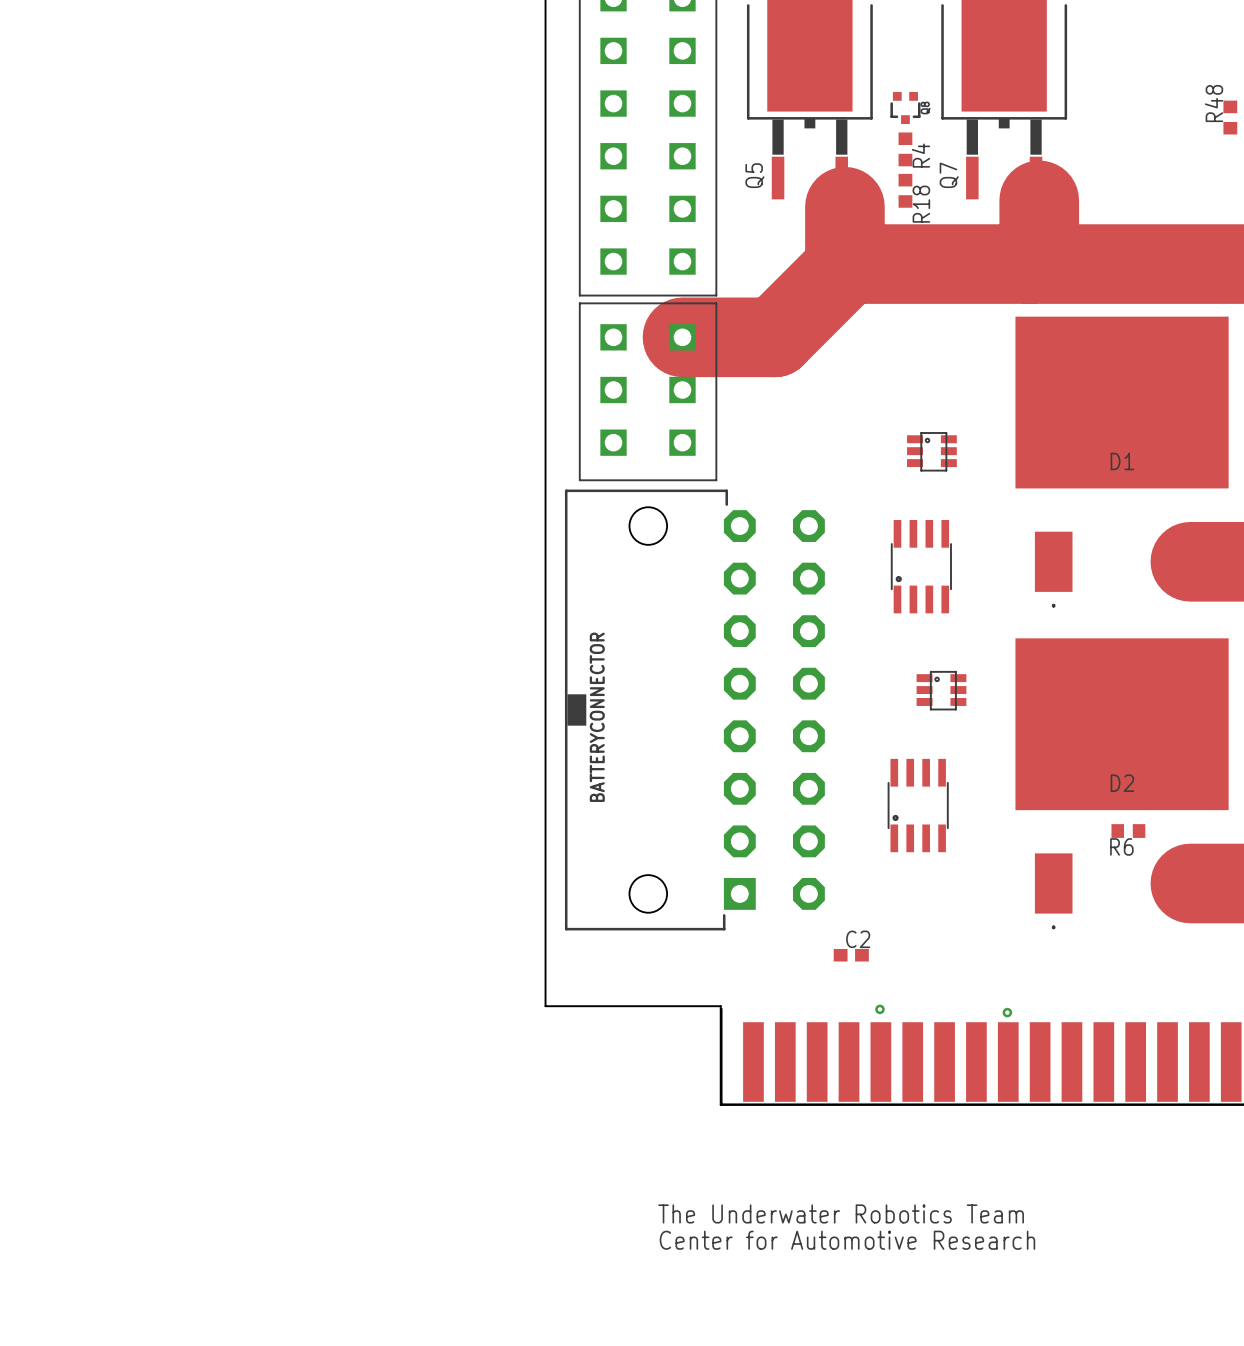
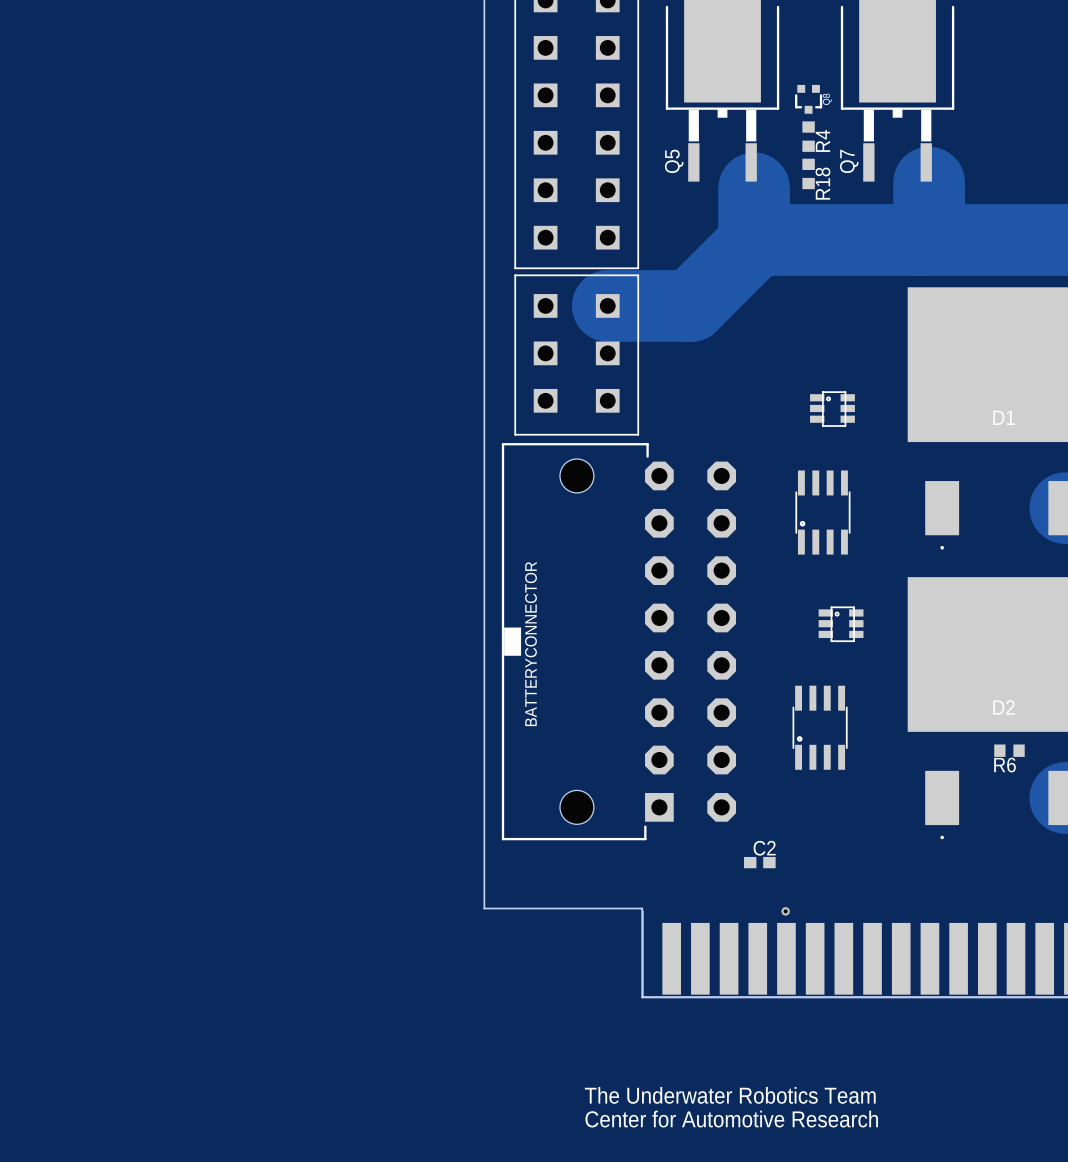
via: (1007, 1012) -> none

